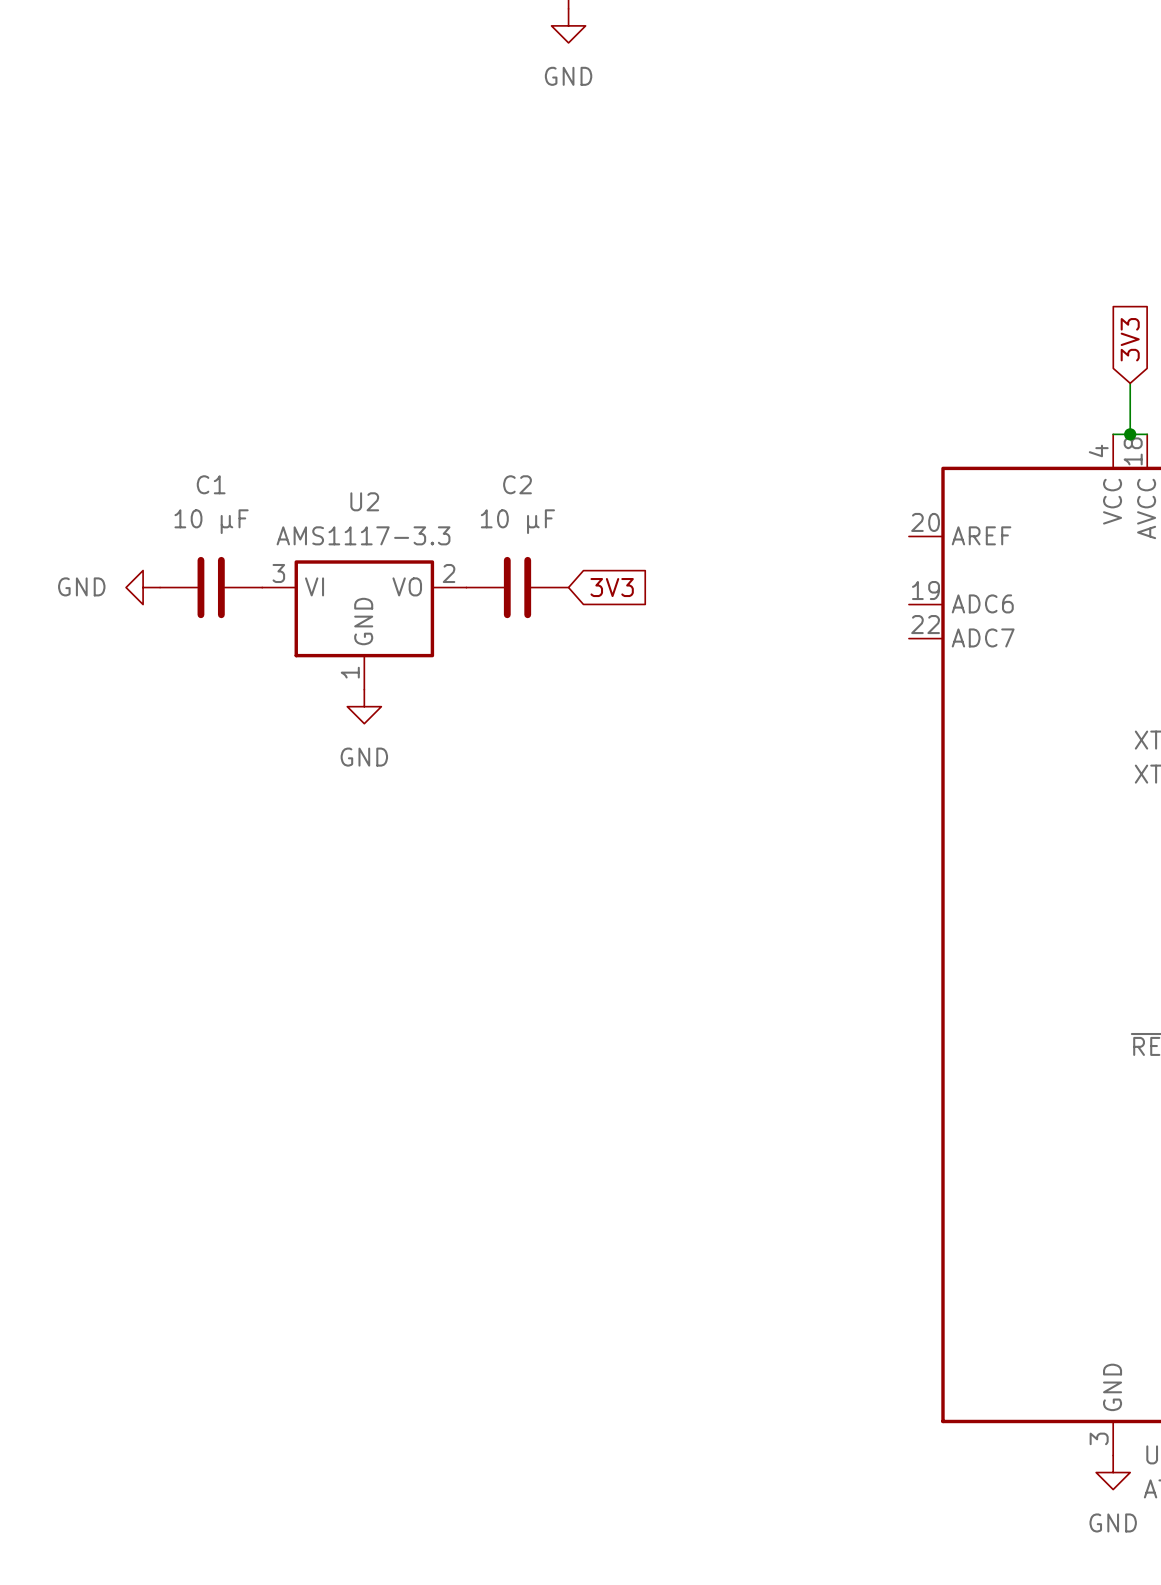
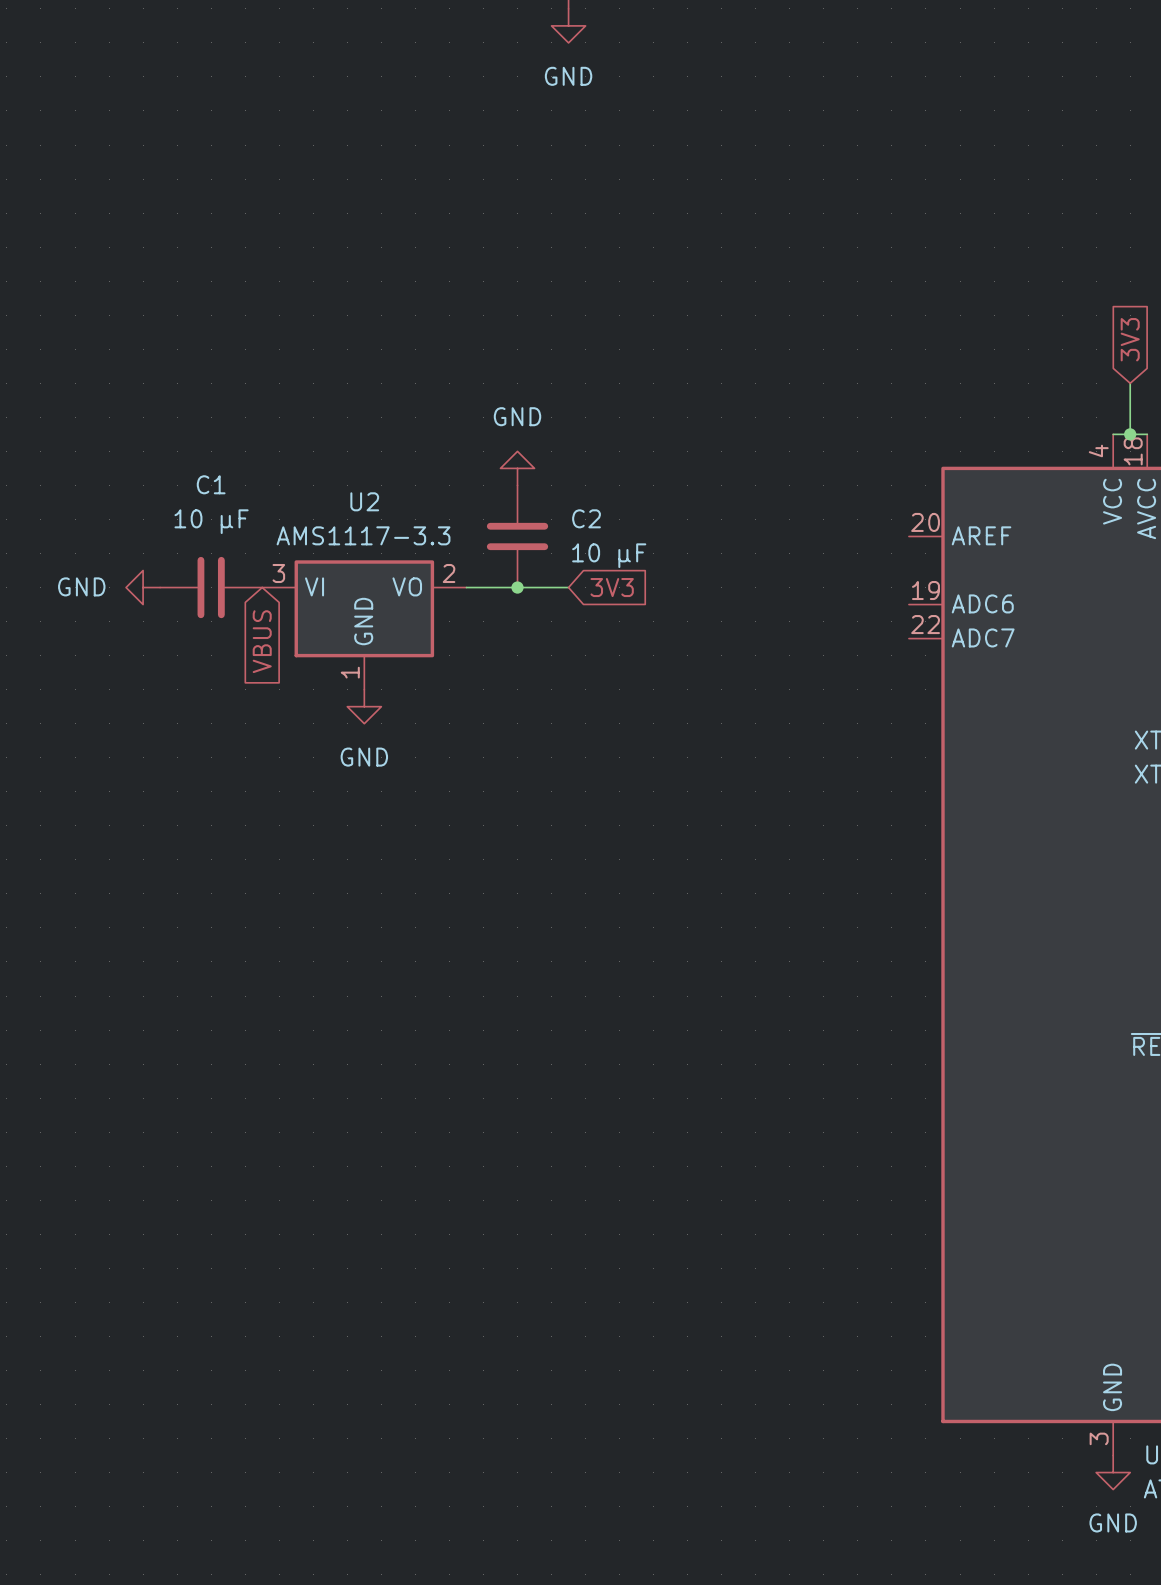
power symbol: none -> GND (517, 468)
C2 name position: C2 (517, 484) -> C2 (586, 518)
C2 value position: 10 µF (517, 521) -> 10 µF (609, 555)
C2 rotation: 0° (517, 587) -> 90° clockwise (517, 536)
junction: none -> (517, 587)
global label: none -> VBUS (262, 641)

